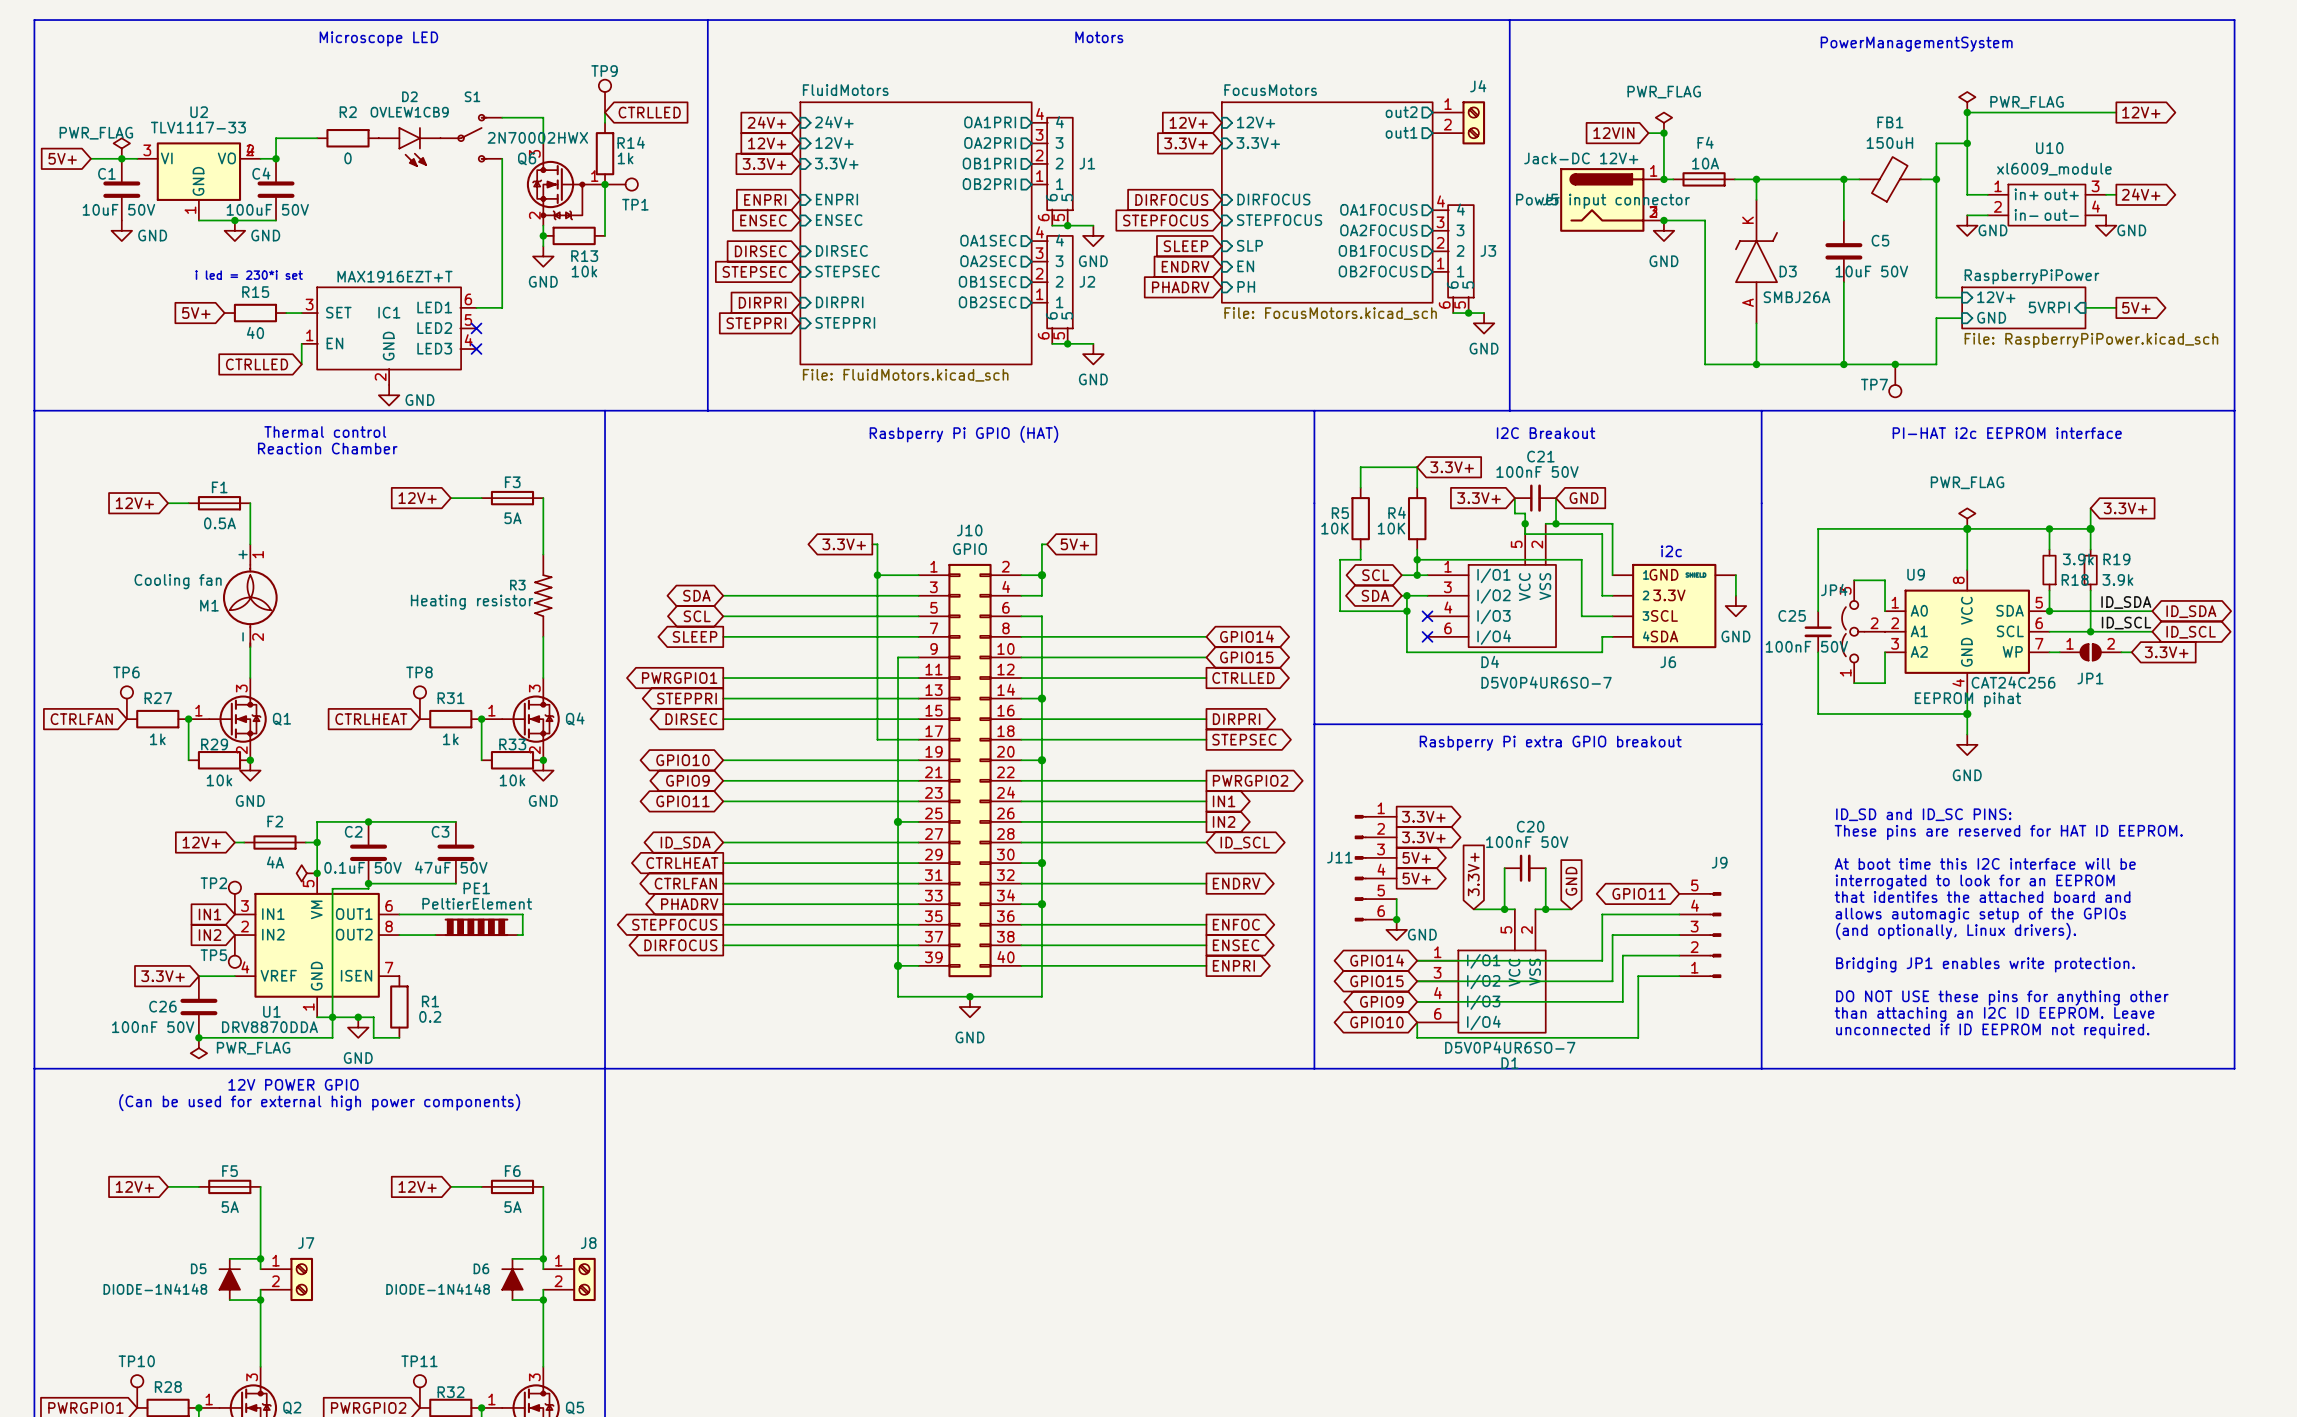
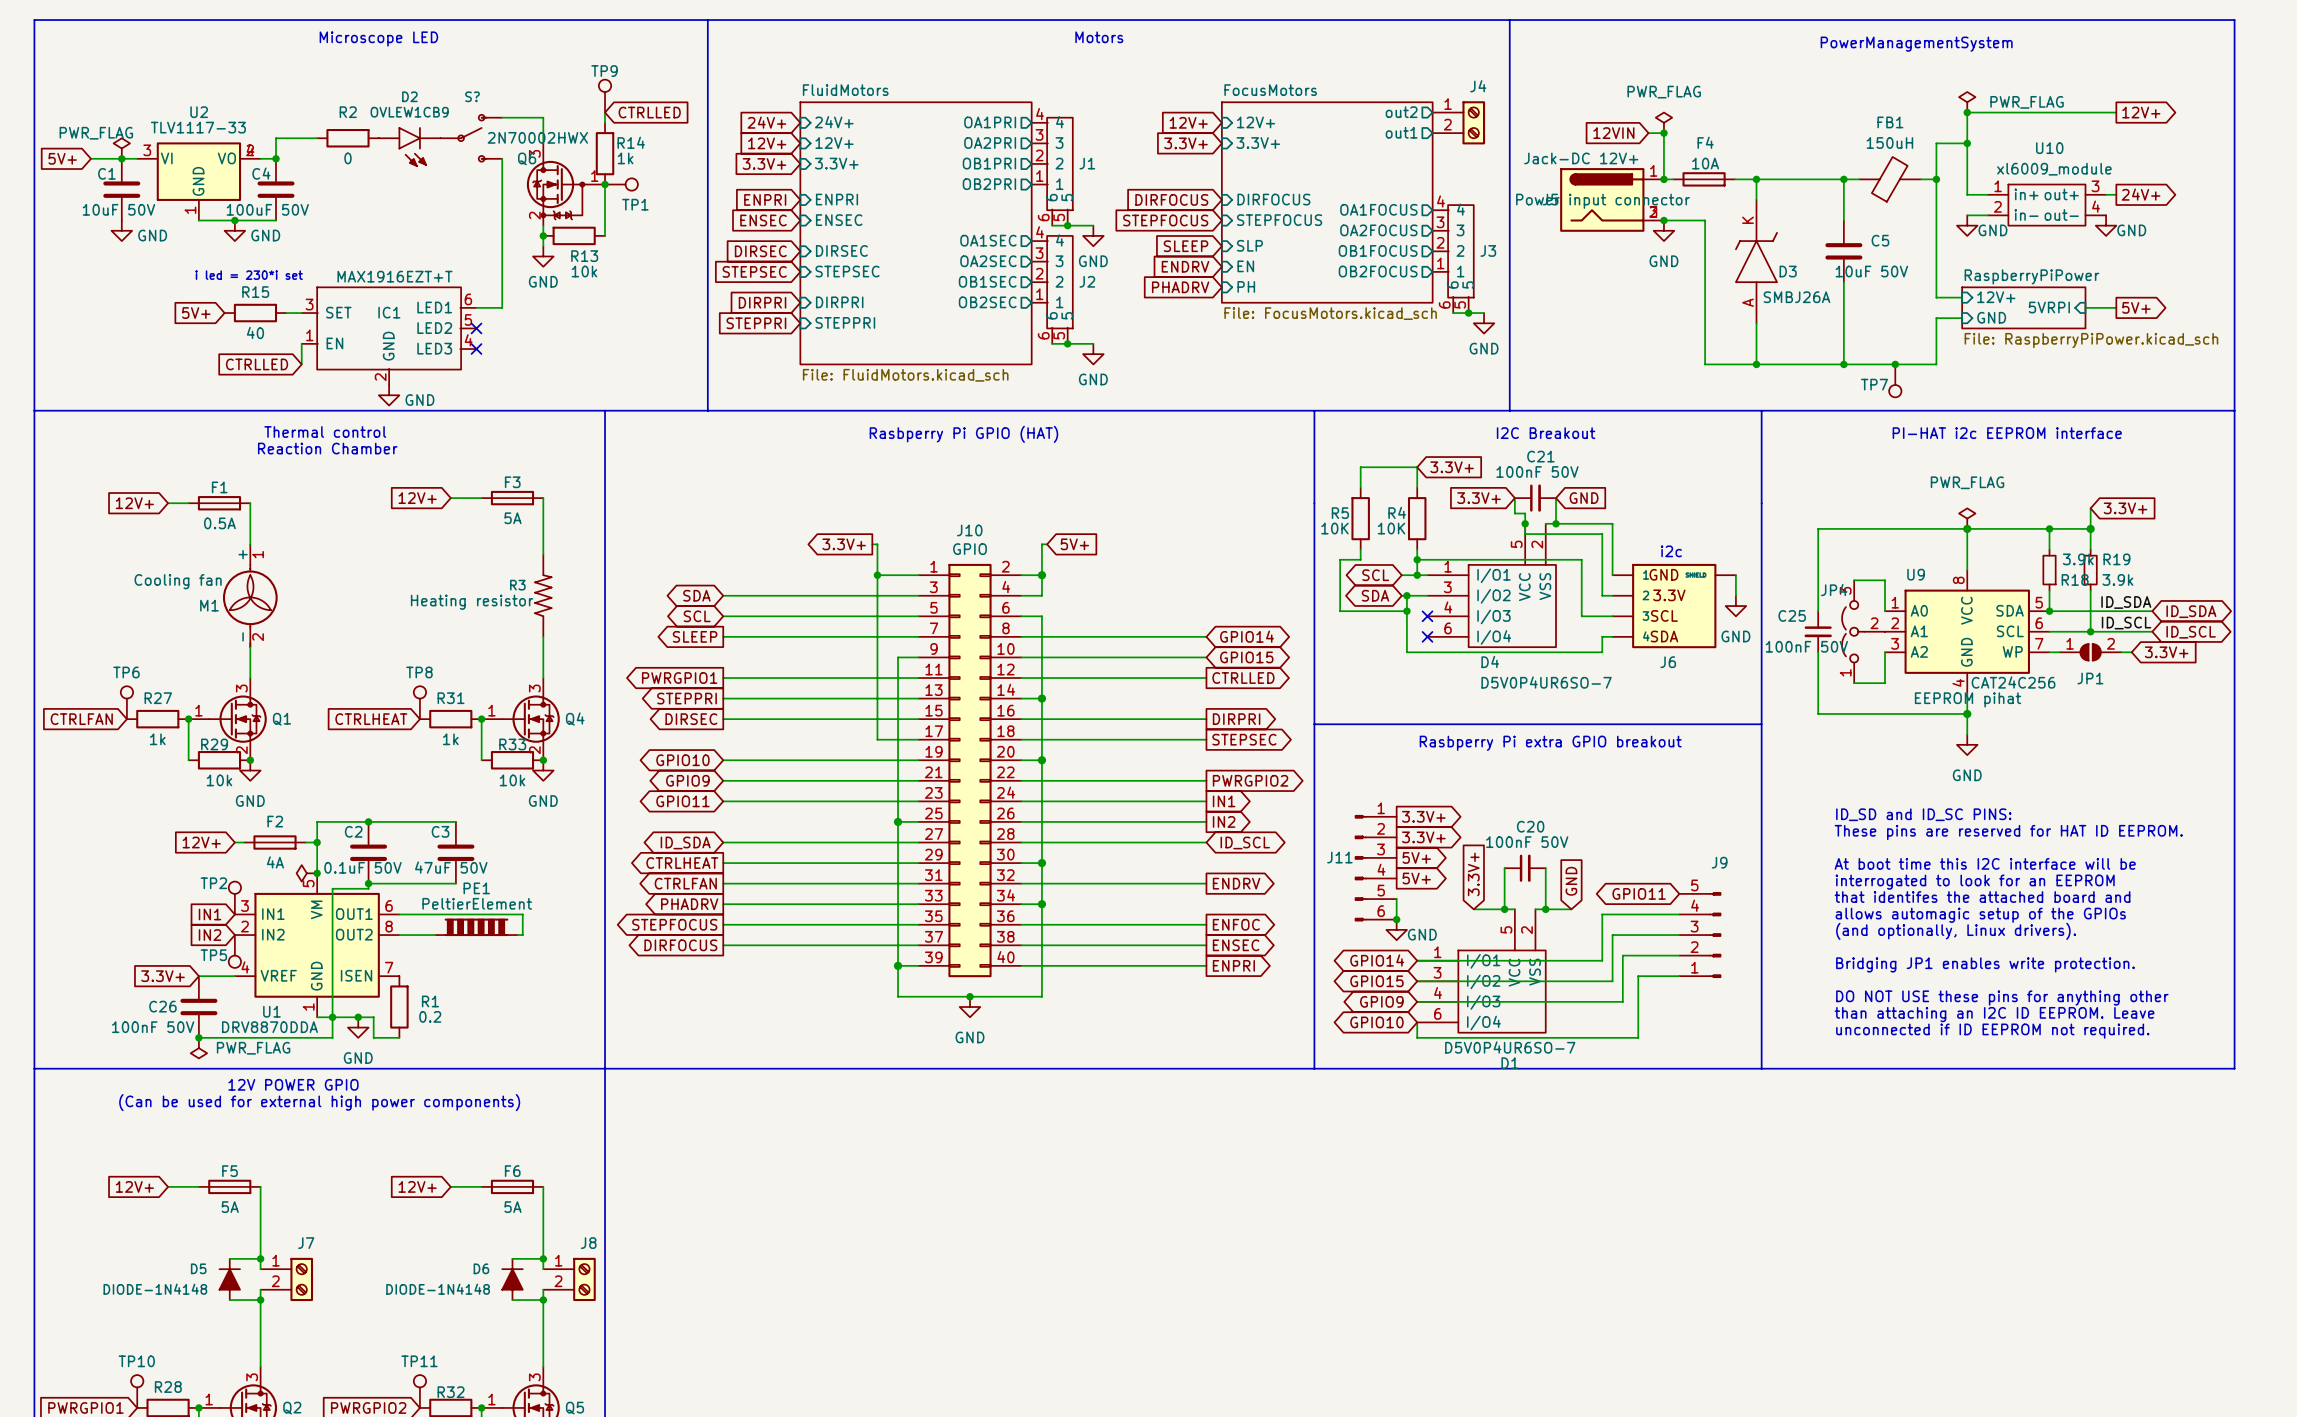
S1 name: S1 (472, 96) -> S? (472, 96)

